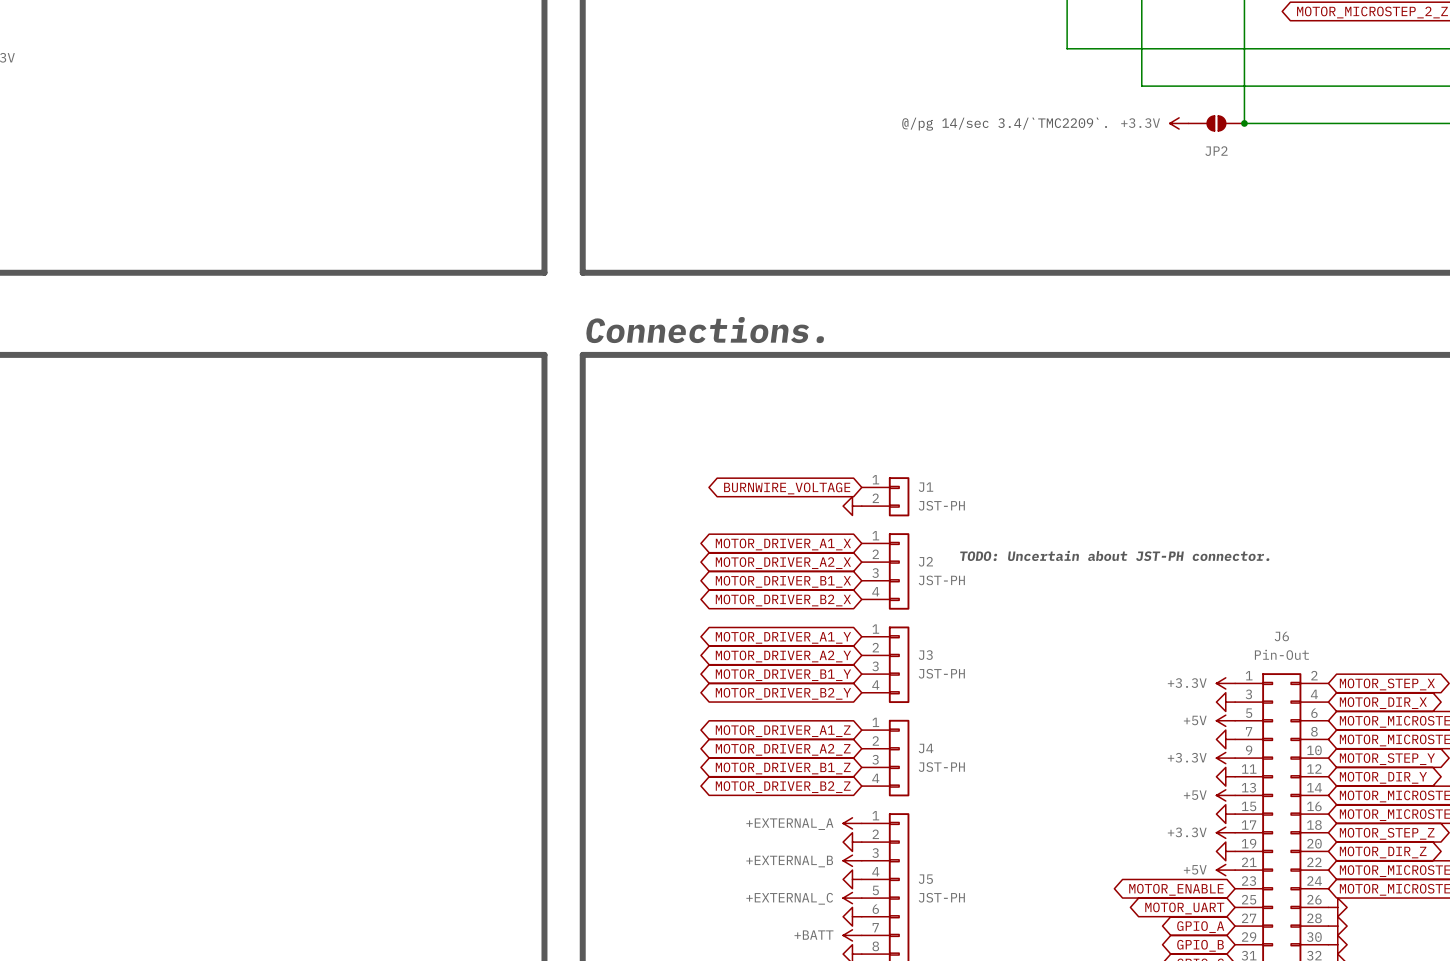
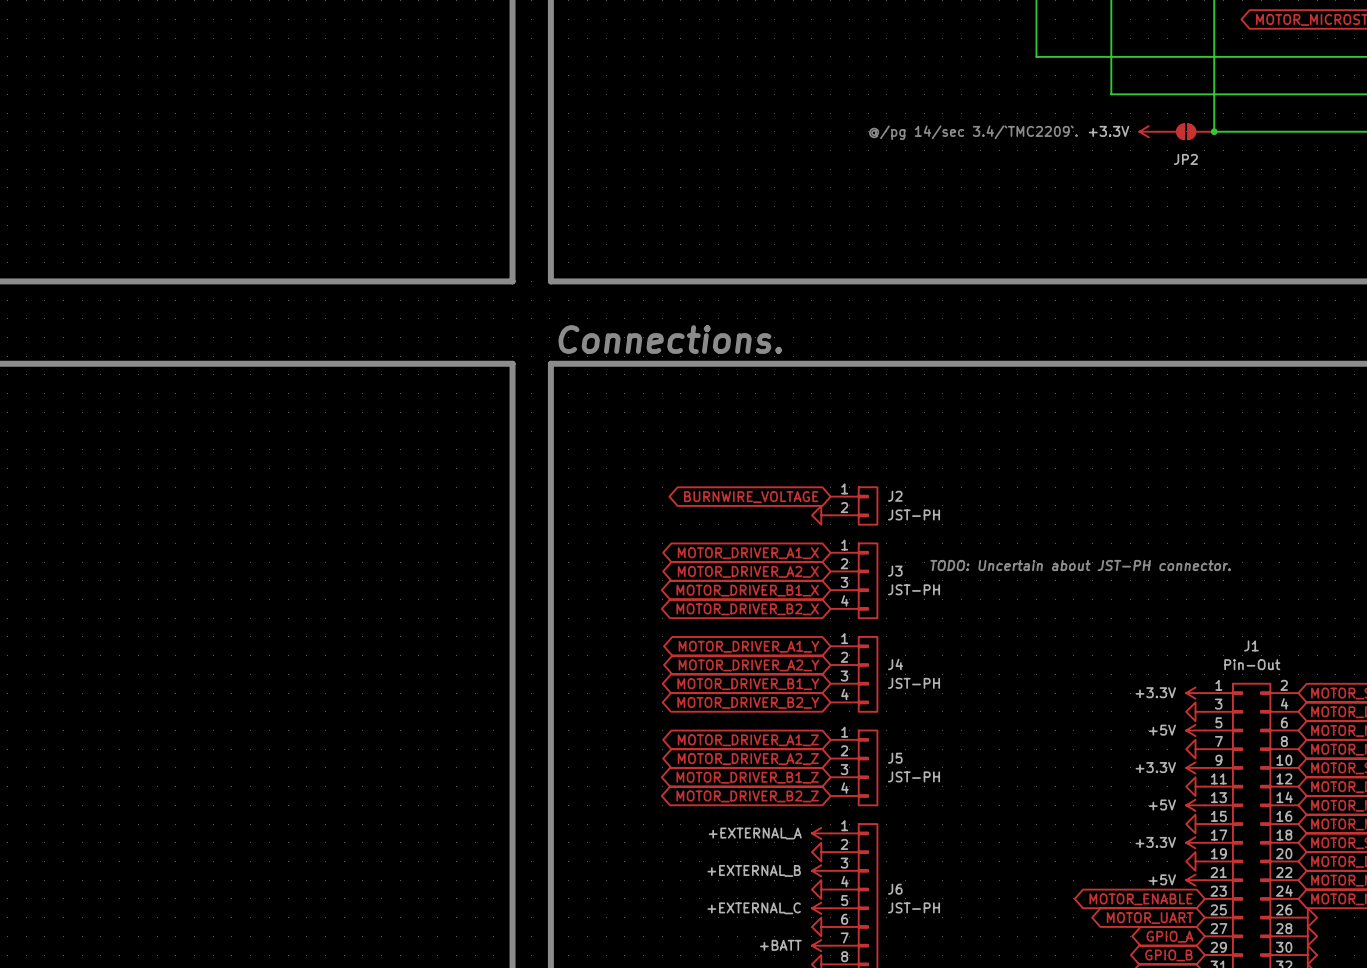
J1 name: J1 (925, 487) -> J2 (895, 496)
J2 name: J2 (925, 561) -> J3 (895, 571)
J6 name: J6 (1281, 636) -> J1 (1251, 645)
J3 name: J3 (925, 655) -> J4 (895, 664)
J4 name: J4 (926, 748) -> J5 (895, 758)
J5 name: J5 (925, 879) -> J6 (895, 889)

